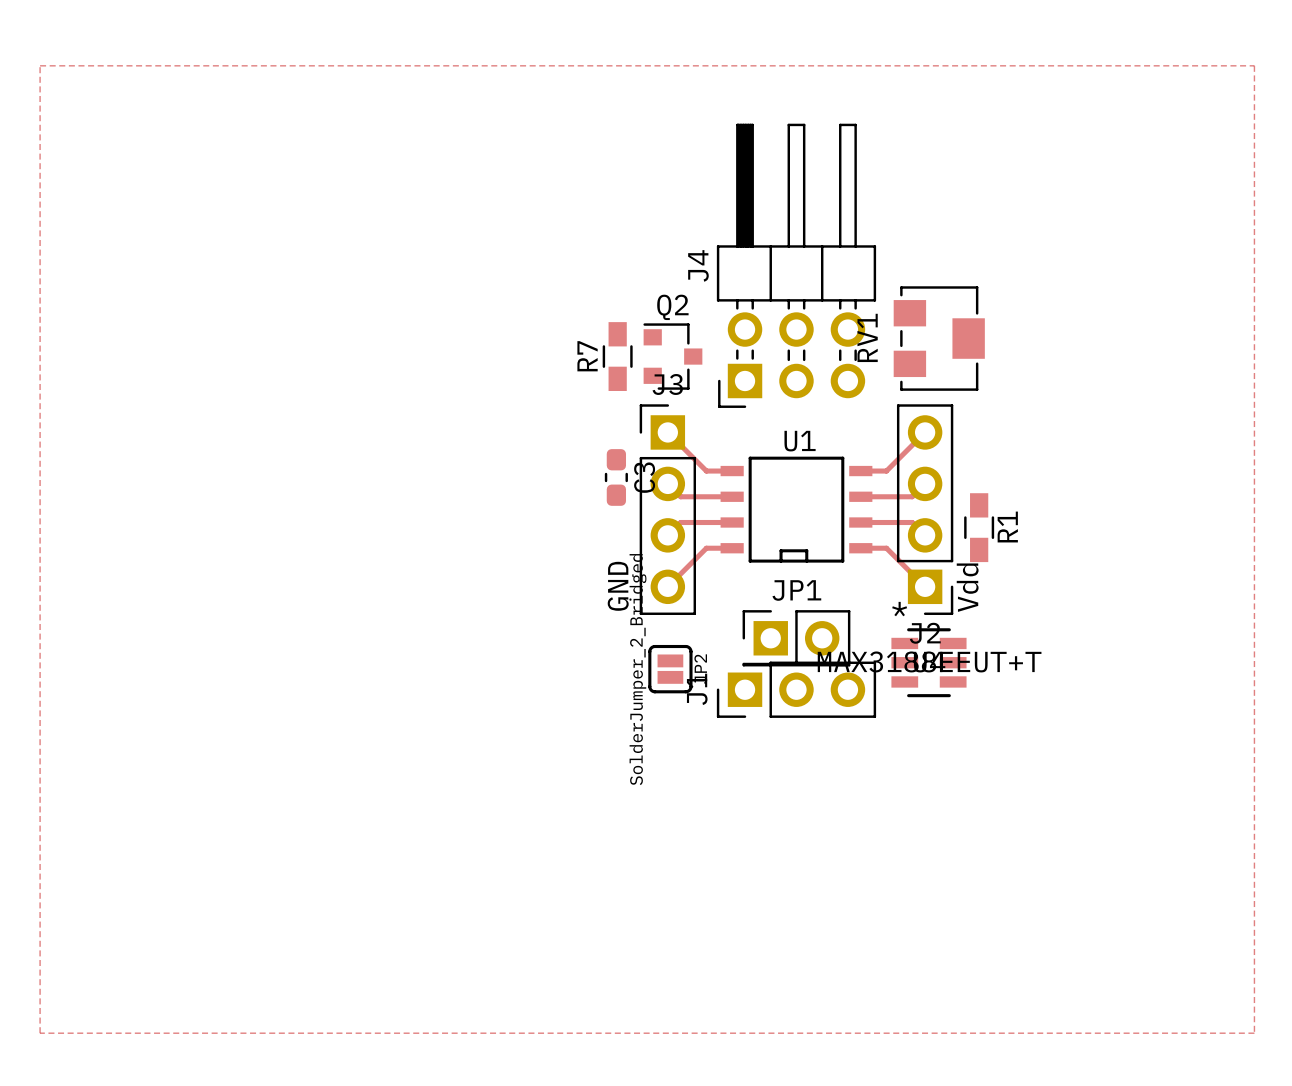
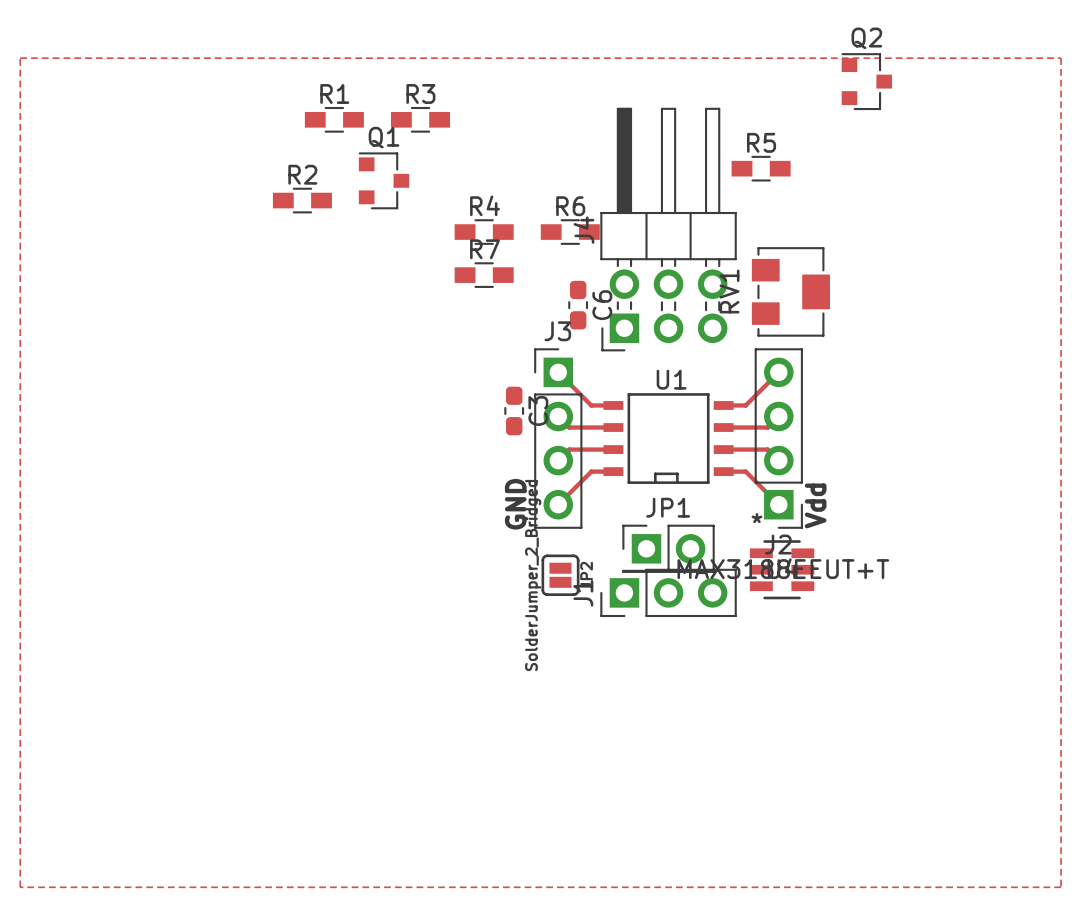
R3: none -> (420, 119)
R5: none -> (761, 168)
Q1: none -> (383, 180)
R2: none -> (302, 200)
R4: none -> (484, 232)
R6: none -> (570, 232)
C6: none -> (578, 305)
R7 rotation: 0° (617, 356) -> 90° clockwise (484, 275)
R7 position: (617, 356) -> (484, 275)
Q2 position: (672, 356) -> (866, 81)
R1 rotation: 0° (979, 527) -> 90° clockwise (334, 119)
R1 position: (979, 527) -> (334, 119)
R1 name position: R1 (1007, 527) -> R1 (334, 93)

